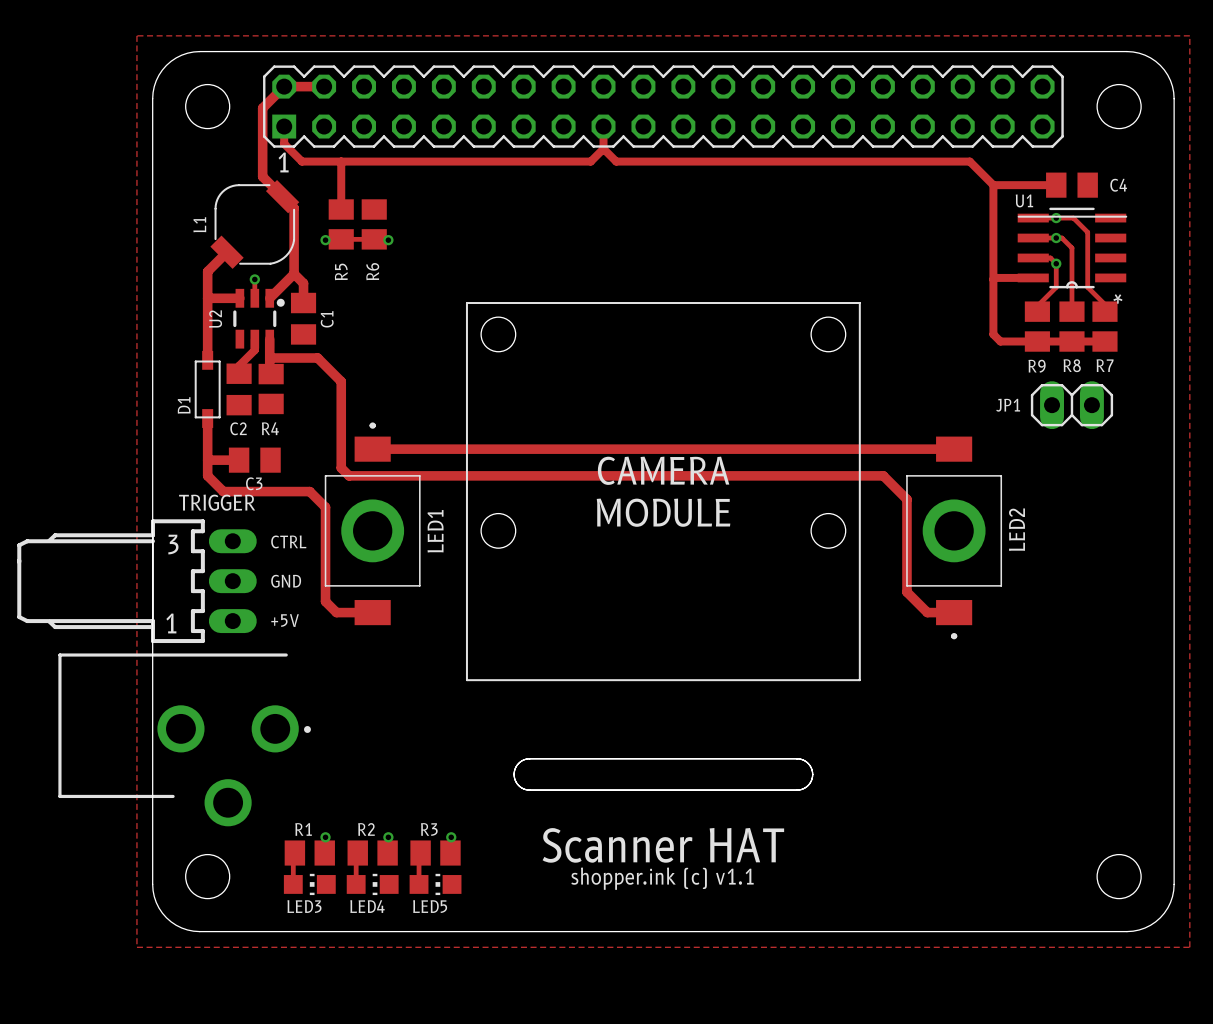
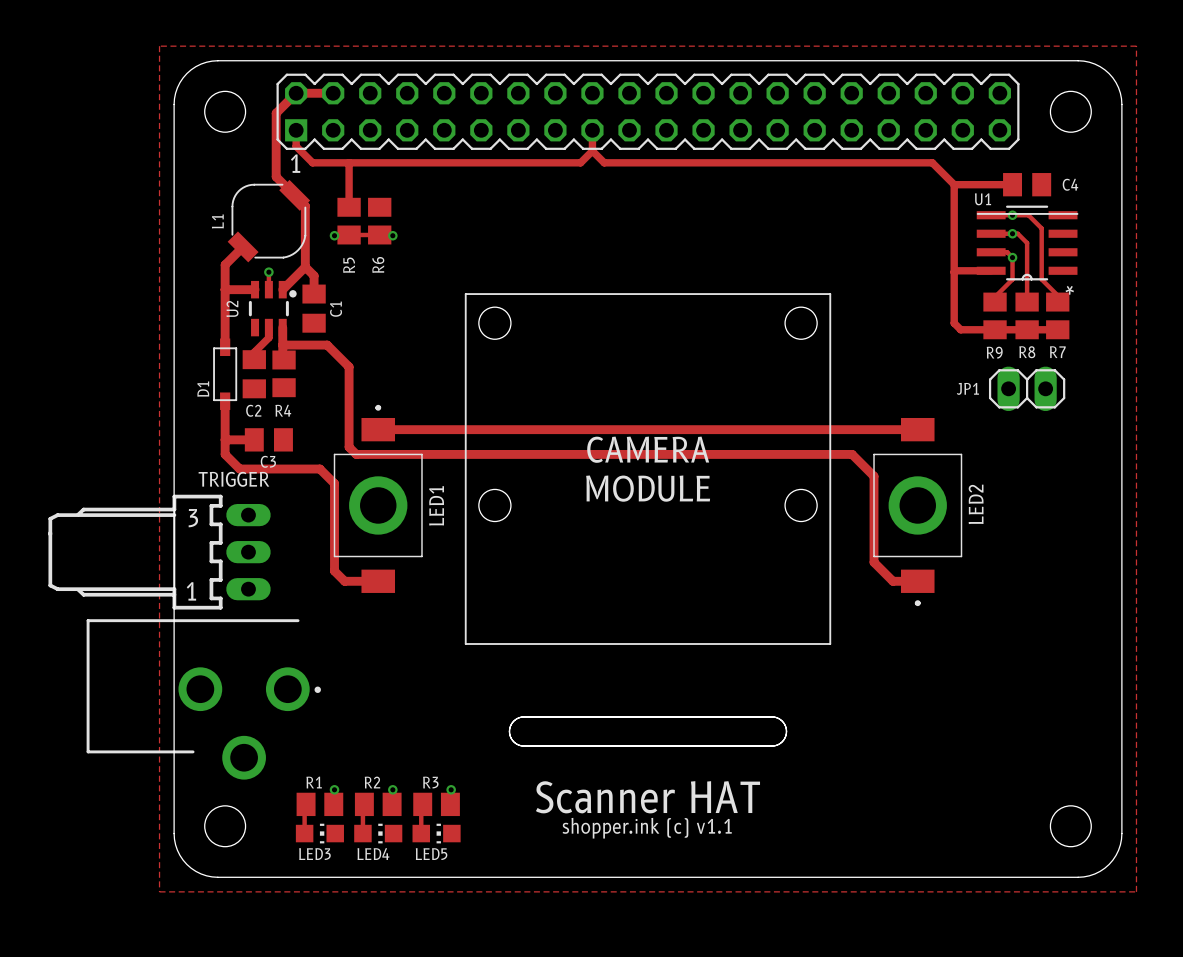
text: CTRL (288, 541) -> none
text: GND (286, 581) -> none
text: +5V (285, 620) -> none

